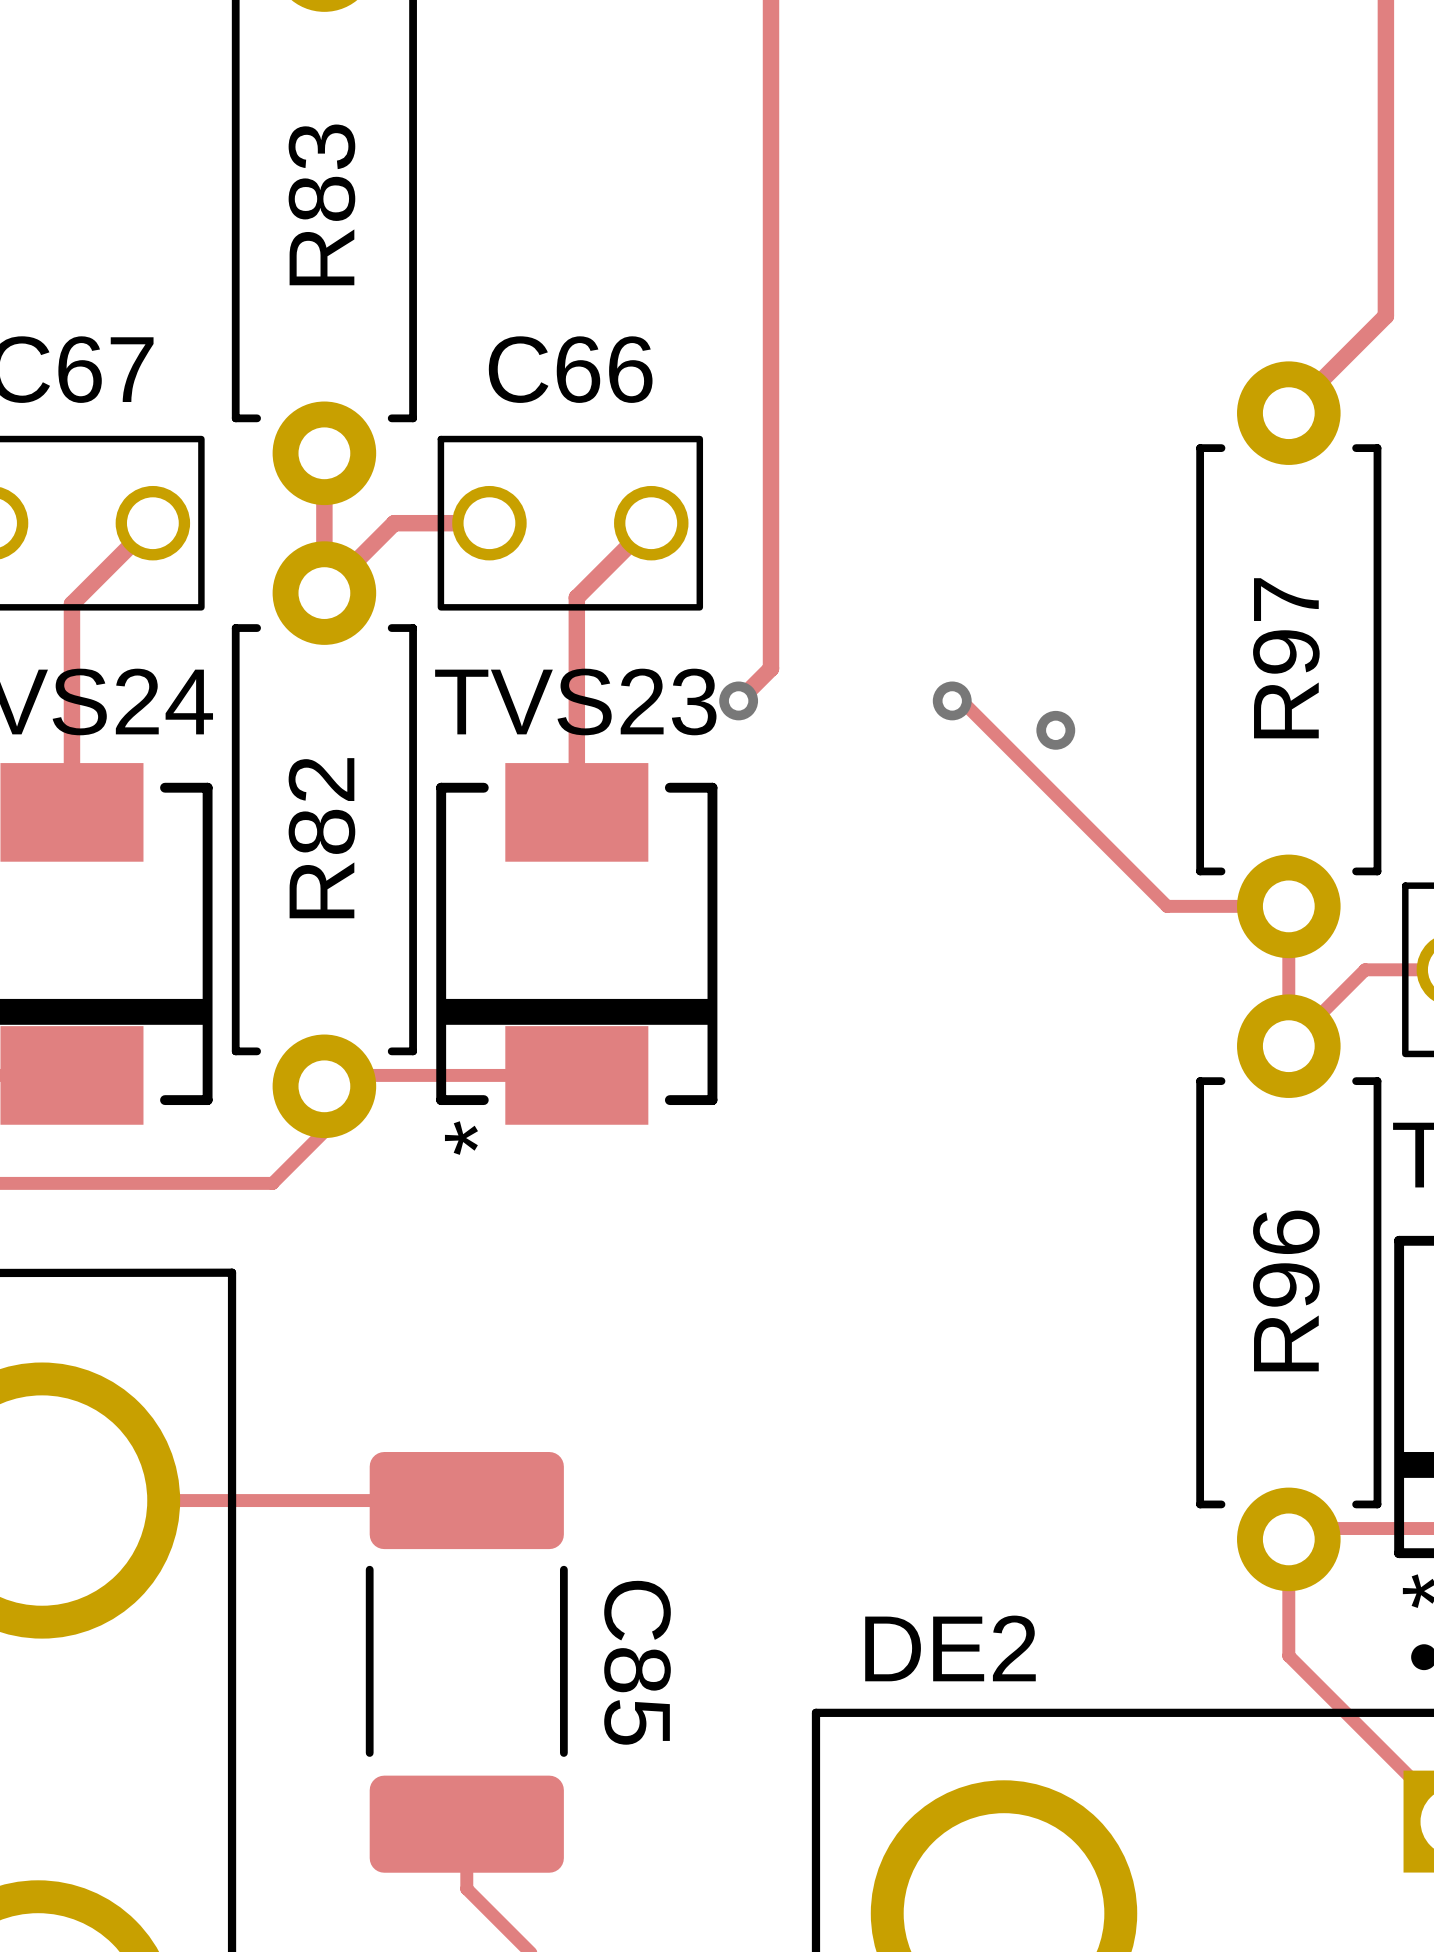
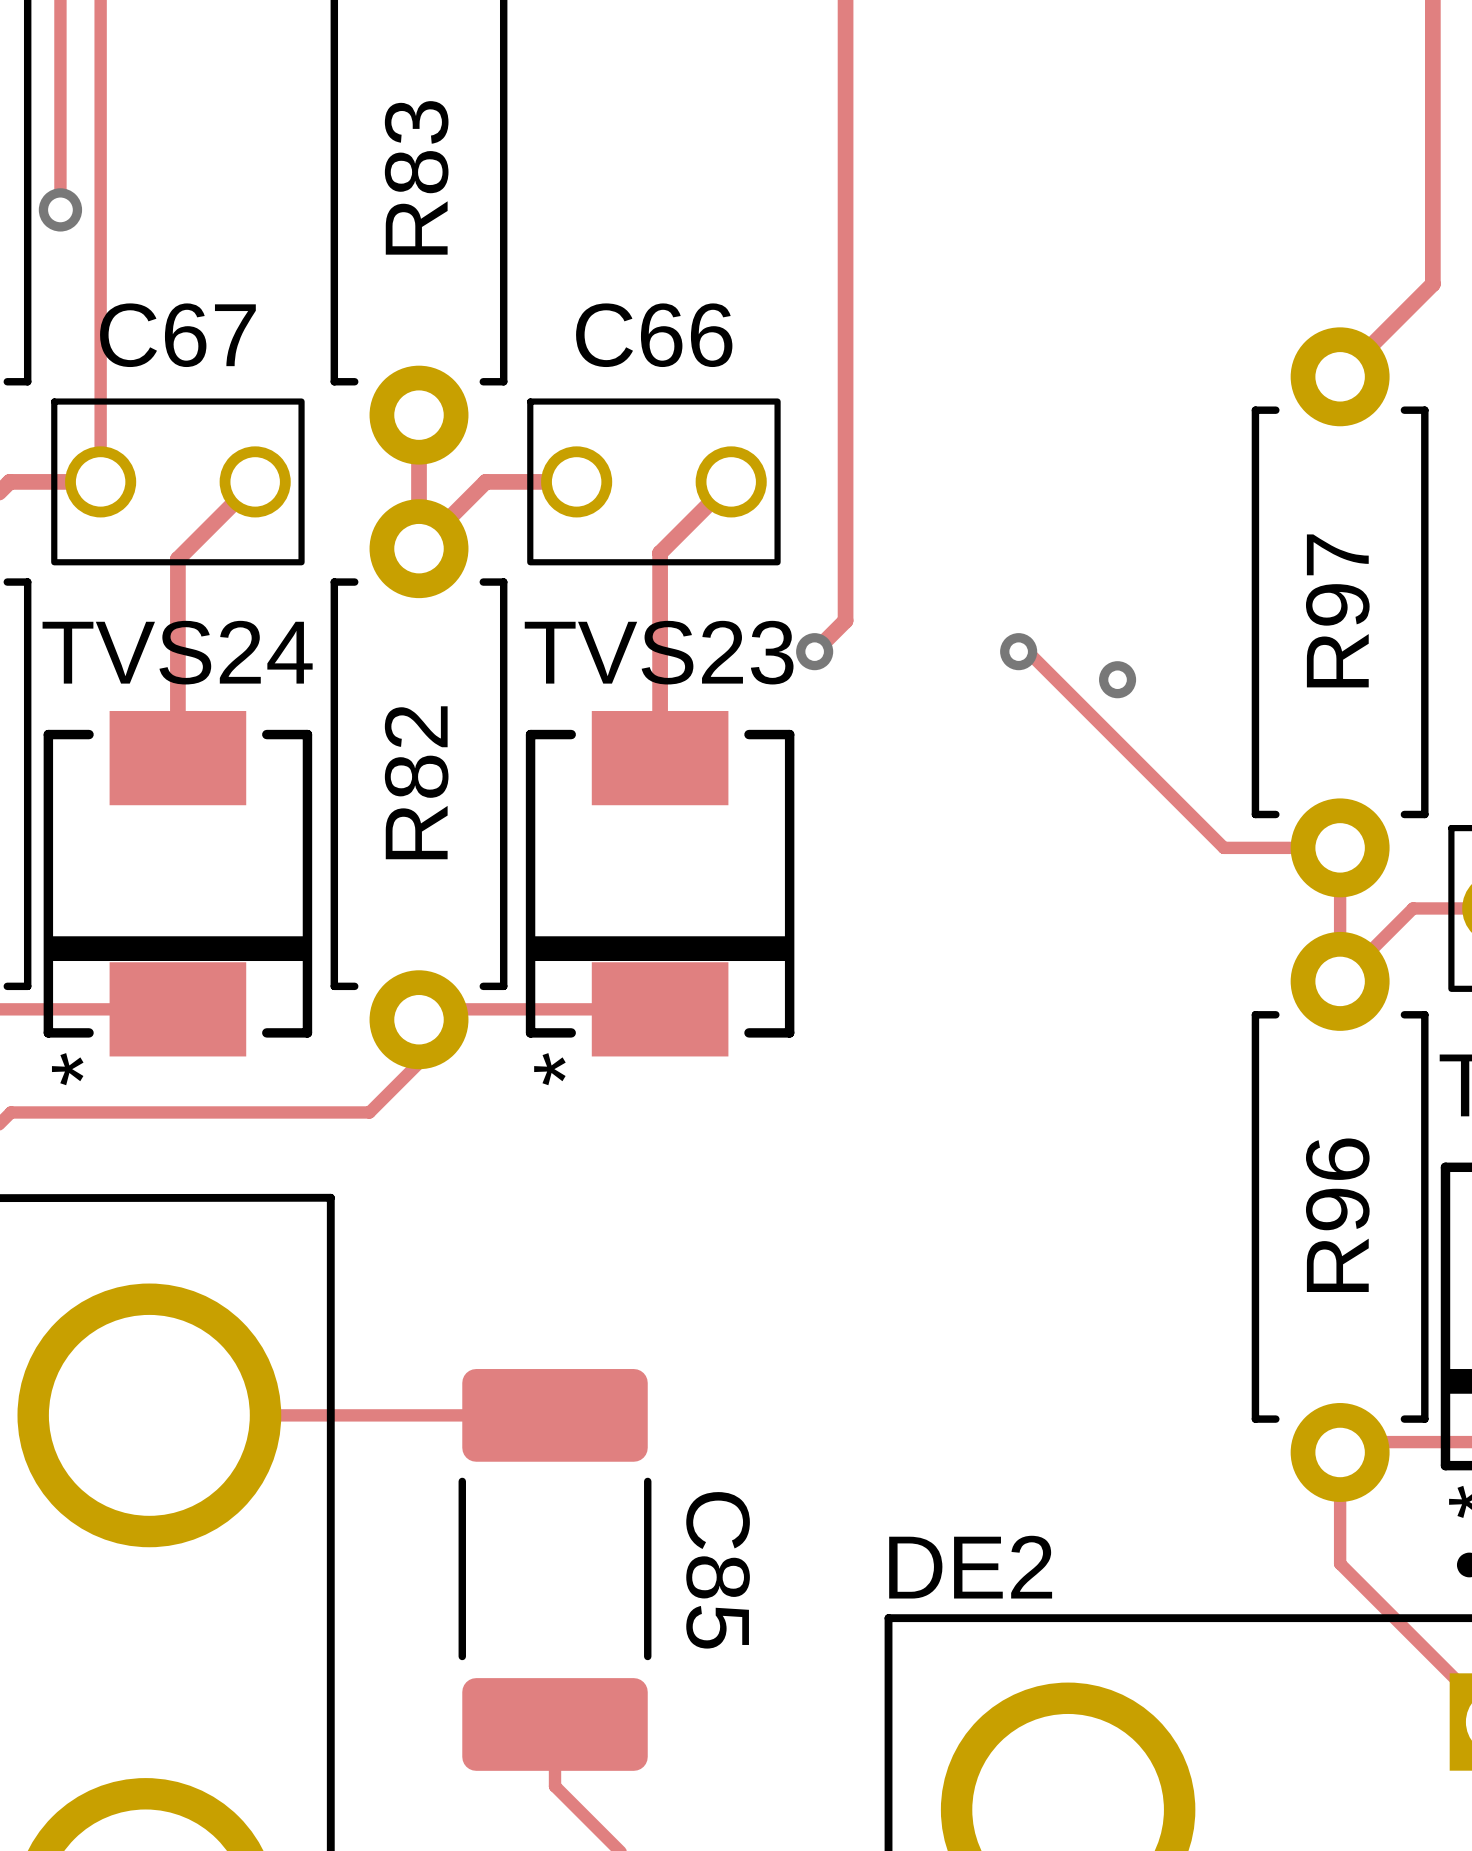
DE2 name position: DE2 (950, 1648) -> DE2 (970, 1567)

